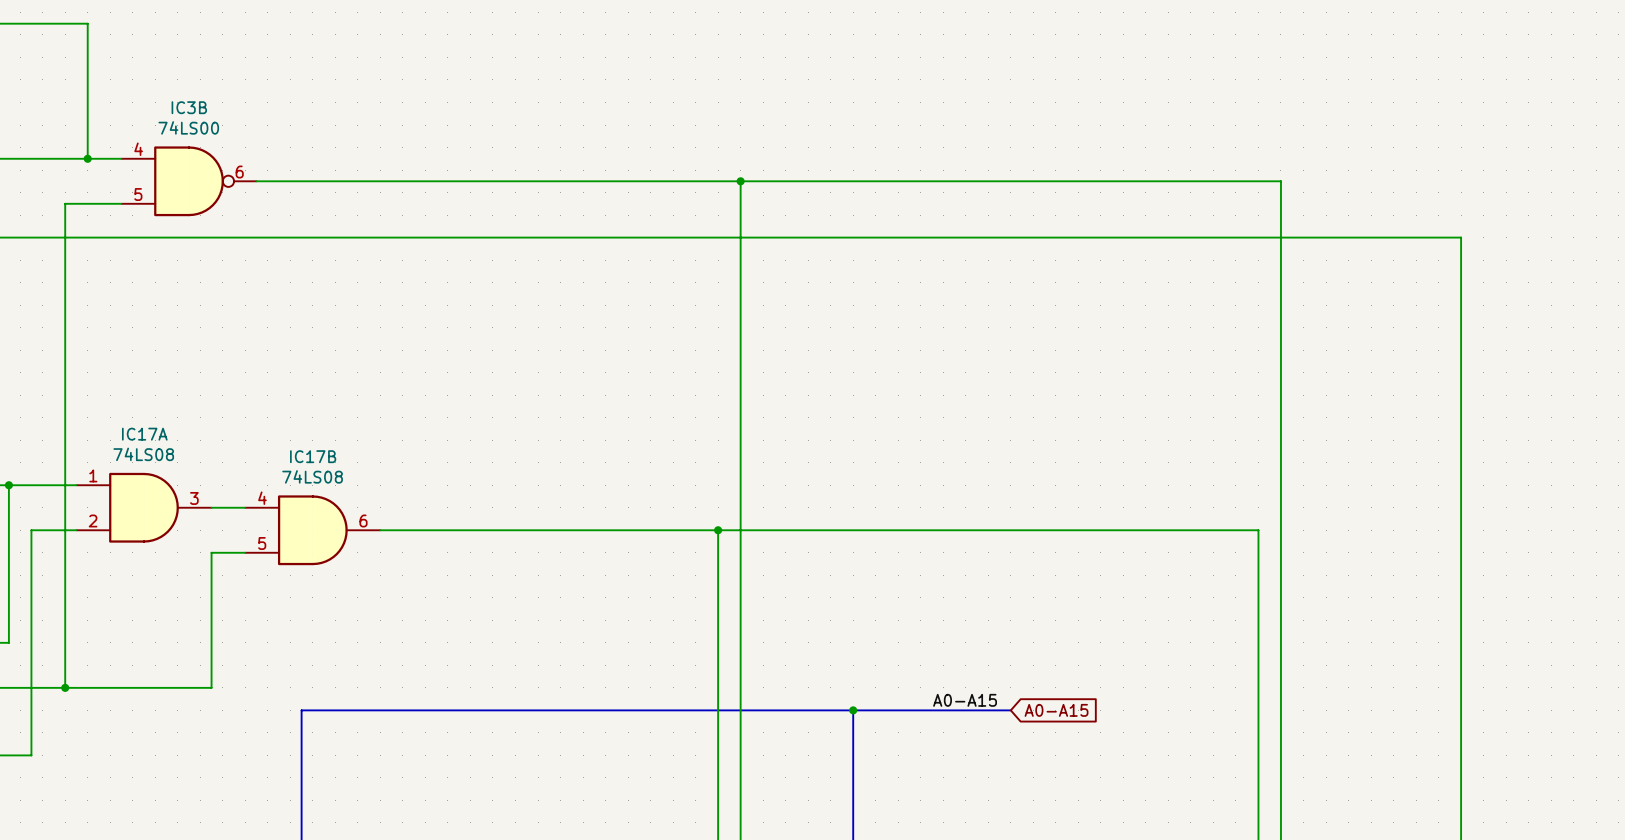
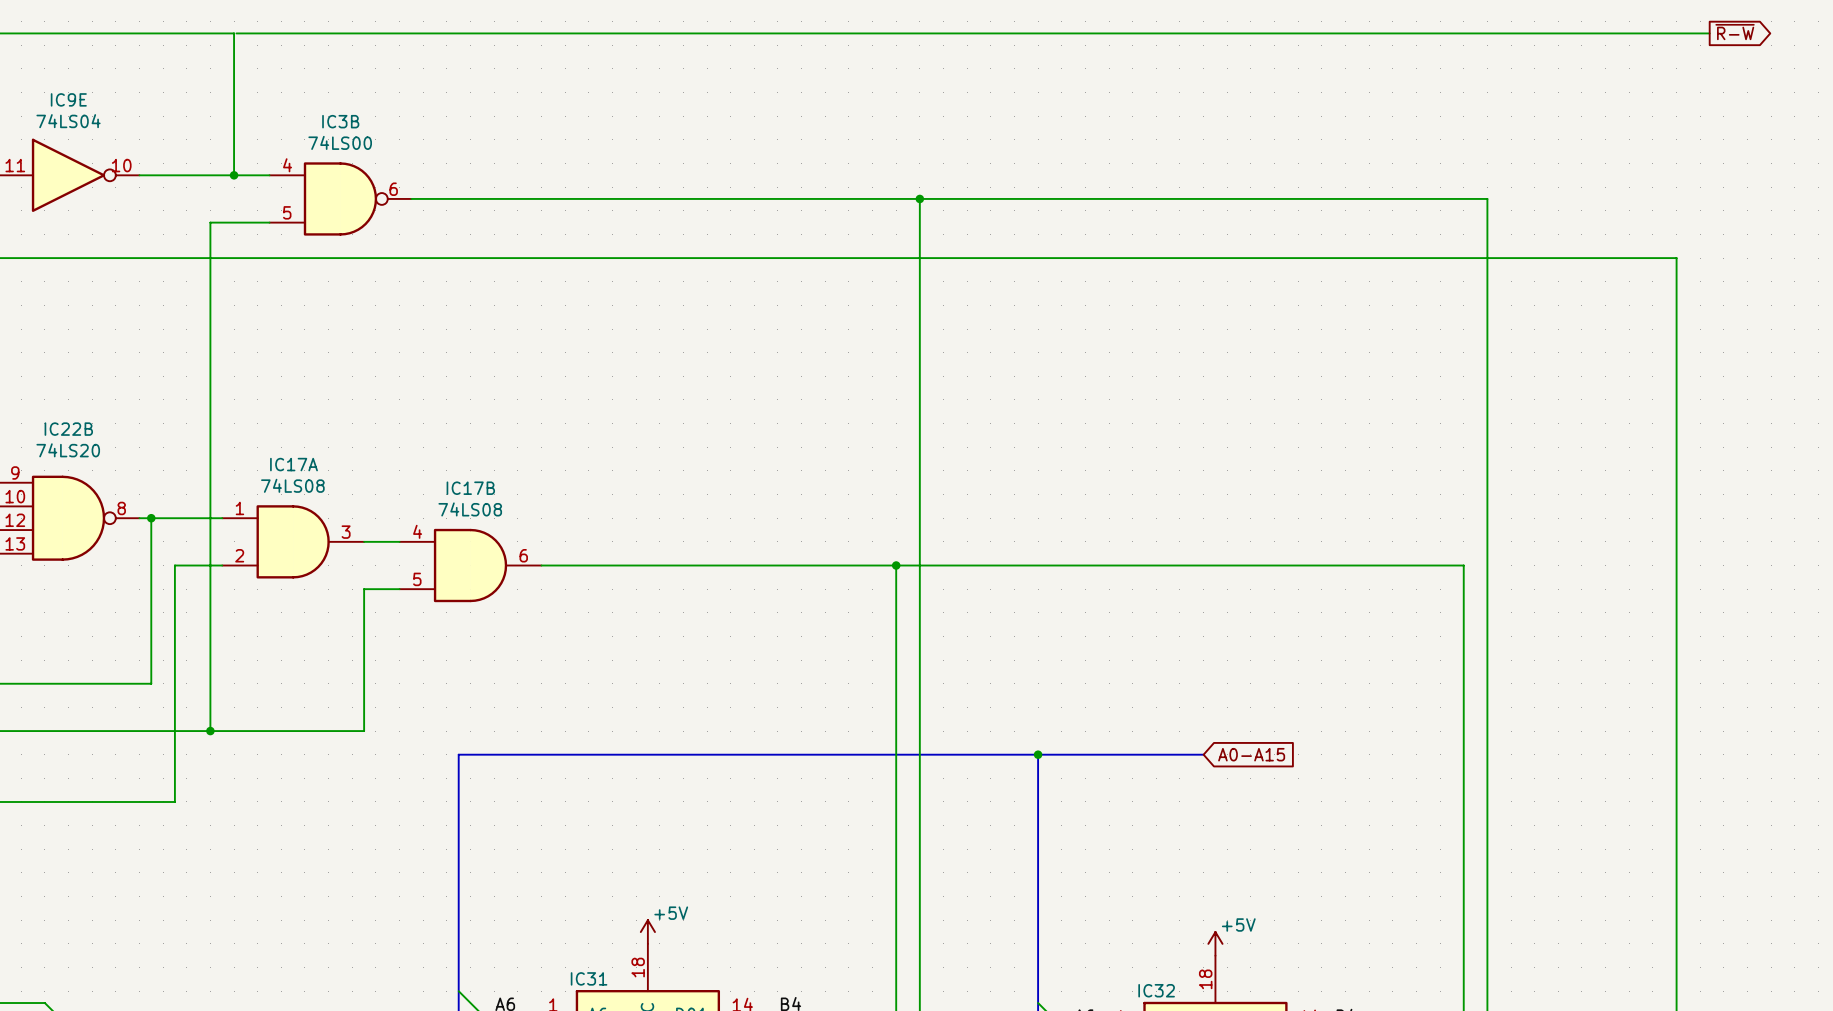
global label: none -> ~{R-W} (1735, 32)
wire: none -> (236, 33) (1709, 33)
label: A0-A15 (965, 700) -> none

